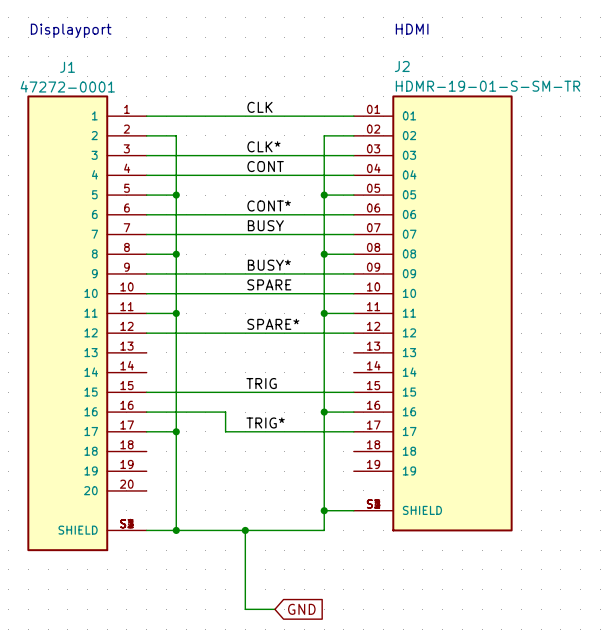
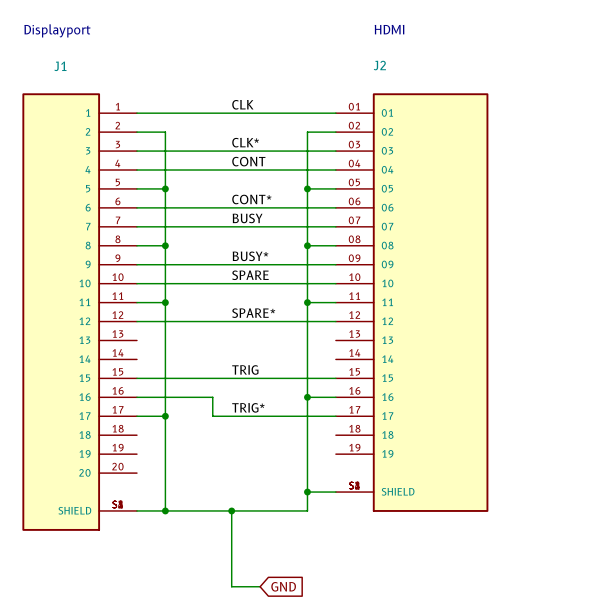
J1 value: 47272-0001 (67, 86) -> none
J2 value: HDMR-19-01-S-SM-TR (488, 86) -> none

